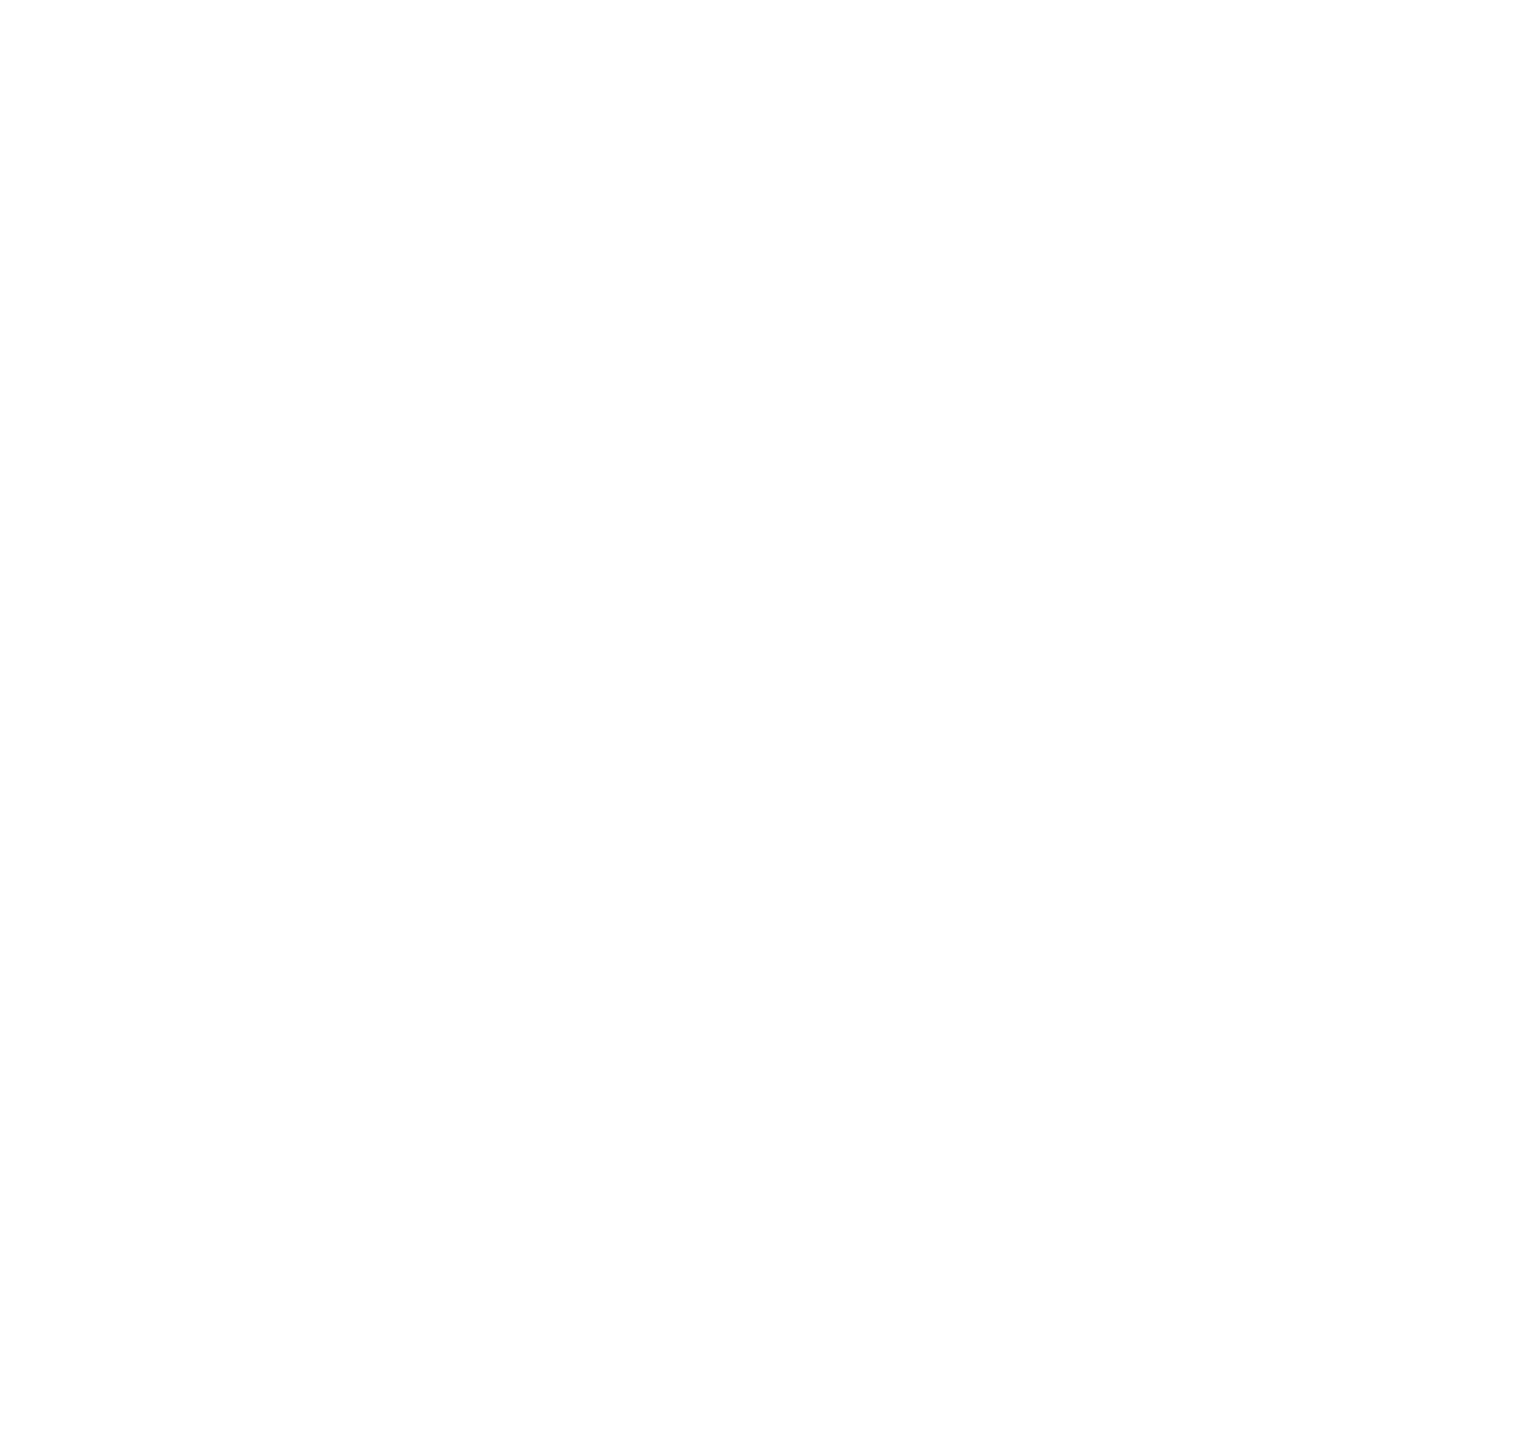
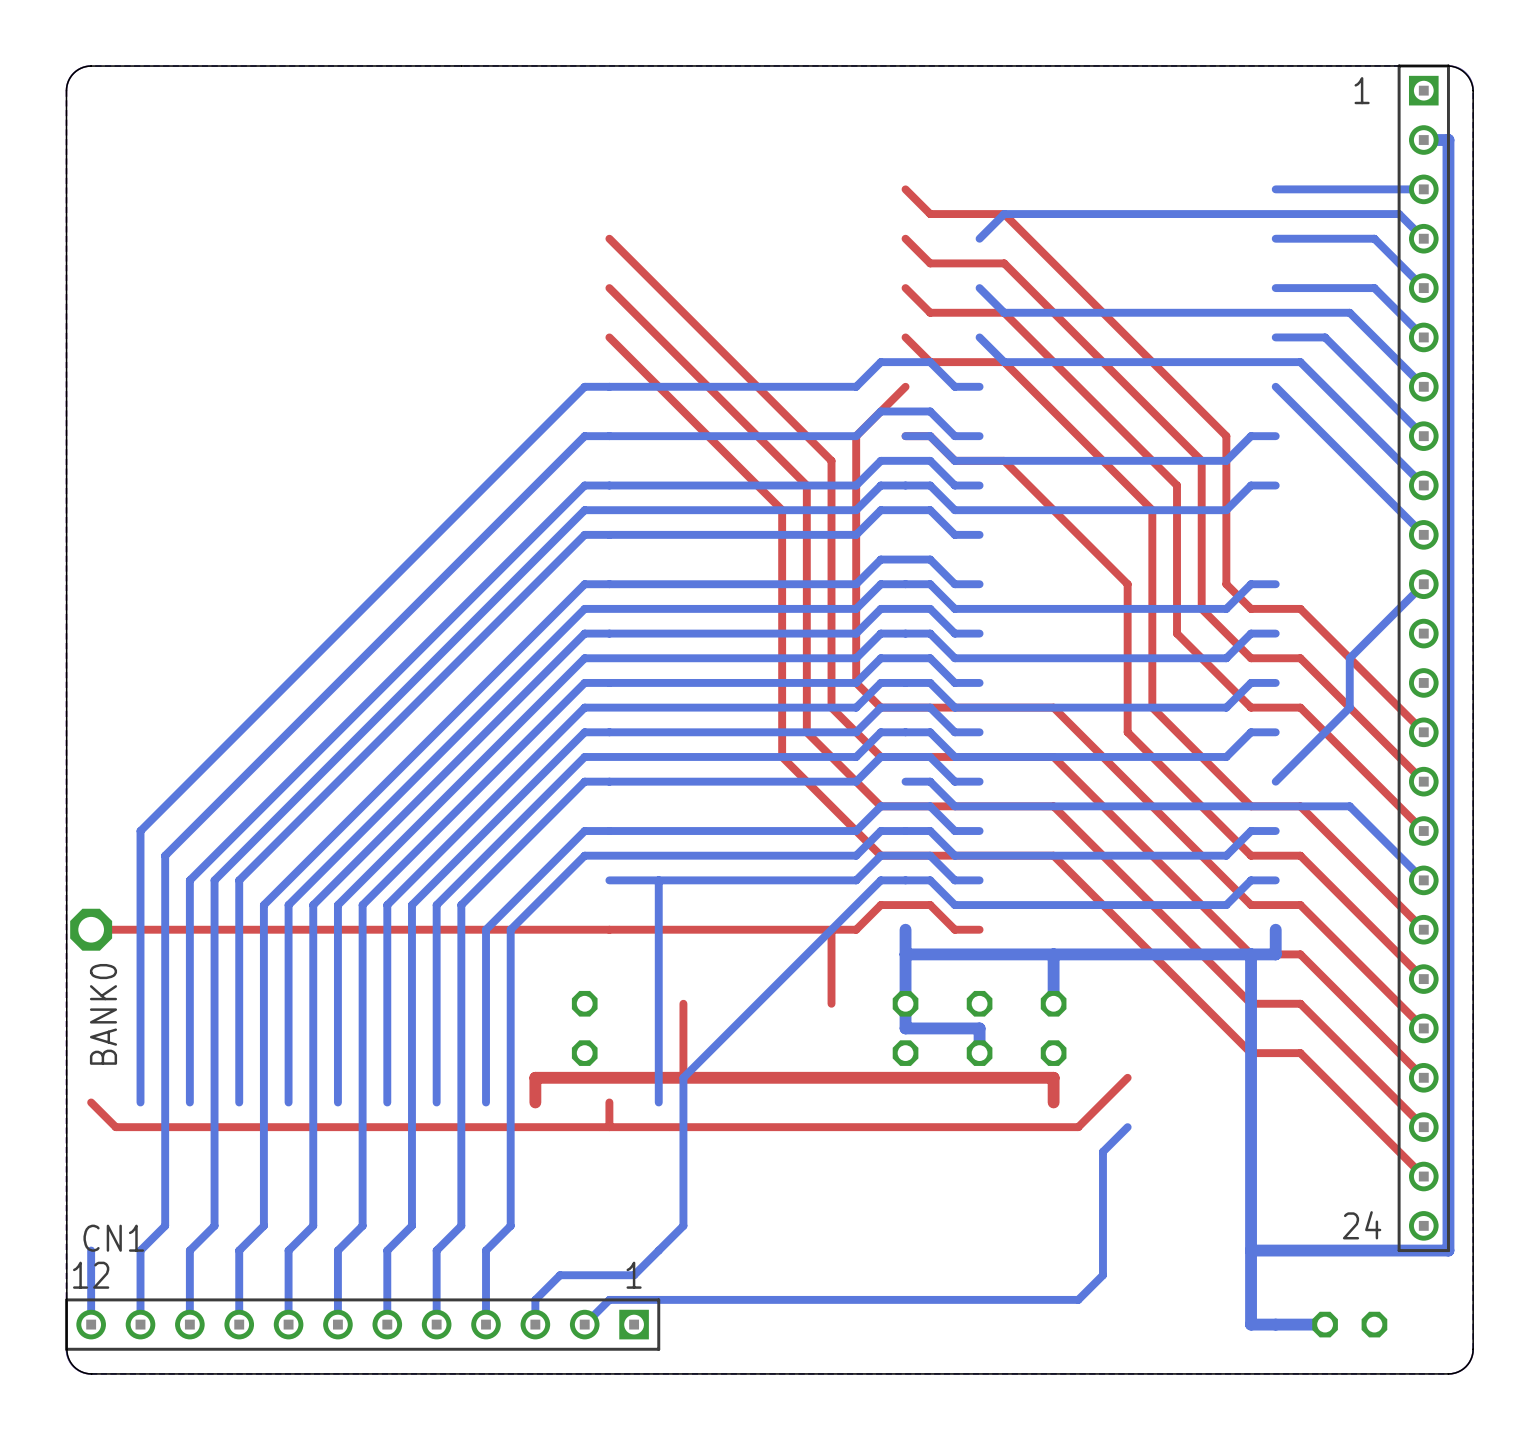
board edge: none -> (1448, 65) (91, 66) (83, 67) (73, 73) (68, 80) (66, 90) (66, 1349) (69, 1359) (74, 1366) (83, 1372) (91, 1373) (1448, 1373) (1457, 1372) (1465, 1366) (1471, 1358) (1473, 1349) (1473, 90) (1470, 81) (1465, 73) (1457, 68) (1448, 65)
bottom track: none -> (1423, 140) (1448, 140) (1448, 1250) (1251, 1250)
top track: none -> (905, 189) (930, 214) (1004, 214) (1226, 436) (1226, 584) (1251, 608) (1300, 608) (1423, 732)
bottom track: none -> (1423, 189) (1275, 189)
top track: none -> (609, 238) (831, 460) (831, 707) (880, 756) (1053, 756) (1251, 954) (1300, 954) (1423, 1077)
top track: none -> (905, 238) (930, 263) (1004, 263) (1201, 460) (1201, 608) (1251, 658) (1300, 658) (1423, 781)
bottom track: none -> (1275, 238) (1374, 238) (1423, 288)
bottom track: none -> (1423, 238) (1399, 214) (1004, 214) (979, 238)
top track: none -> (609, 288) (806, 485) (806, 732) (880, 806) (1053, 806) (1251, 1003) (1300, 1003) (1423, 1127)
top track: none -> (905, 288) (930, 312) (1004, 312) (1177, 485) (1177, 633) (1251, 707) (1300, 707) (1423, 831)
bottom track: none -> (979, 288) (1004, 312) (1349, 312) (1423, 386)
bottom track: none -> (1275, 288) (1374, 288) (1423, 337)
top track: none -> (609, 337) (782, 510) (782, 756) (880, 855) (1053, 855) (1251, 1053) (1300, 1053) (1423, 1176)
top track: none -> (905, 337) (930, 362) (1004, 362) (1152, 510) (1152, 707) (1251, 806) (1300, 806) (1423, 929)
bottom track: none -> (979, 337) (1004, 362) (1300, 362) (1423, 485)
bottom track: none -> (1275, 337) (1325, 337) (1423, 436)
top track: none -> (905, 386) (856, 436) (856, 682) (880, 707) (1053, 707) (1251, 905) (1300, 905) (1423, 1028)
bottom track: none -> (979, 386) (954, 386) (930, 362) (880, 362) (856, 386) (584, 386) (140, 831) (140, 1102)
bottom track: none -> (1275, 386) (1423, 534)
top track: none -> (905, 436) (930, 436) (954, 460) (1004, 460) (1127, 584) (1127, 732) (1251, 855) (1300, 855) (1423, 979)
bottom track: none -> (979, 436) (954, 436) (930, 411) (880, 411) (856, 436) (584, 436) (165, 855) (165, 1225) (140, 1250) (140, 1324)
bottom track: none -> (1275, 436) (1251, 436) (1226, 460) (954, 460) (930, 436) (905, 436)
bottom track: none -> (979, 485) (954, 485) (930, 460) (880, 460) (856, 485) (584, 485) (189, 880) (189, 1102)
bottom track: none -> (1275, 485) (1251, 485) (1226, 510) (954, 510) (930, 485) (880, 485) (856, 510) (584, 510) (214, 880) (214, 1225) (189, 1250) (189, 1324)
bottom track: none -> (979, 534) (954, 534) (930, 510) (880, 510) (856, 534) (584, 534) (239, 880) (239, 1102)
bottom track: none -> (979, 584) (954, 584) (930, 559) (880, 559) (856, 584) (584, 584) (263, 905) (263, 1225) (239, 1250) (239, 1324)
bottom track: none -> (1275, 584) (1251, 584) (1226, 608) (954, 608) (930, 584) (880, 584) (856, 608) (584, 608) (288, 905) (288, 1102)
bottom track: none -> (1423, 584) (1349, 658) (1349, 707) (1275, 781)
bottom track: none -> (979, 633) (954, 633) (930, 608) (880, 608) (856, 633) (584, 633) (313, 905) (313, 1225) (288, 1250) (288, 1324)
bottom track: none -> (1275, 633) (1251, 633) (1226, 658) (954, 658) (930, 633) (880, 633) (856, 658) (584, 658) (337, 905) (337, 1102)
bottom track: none -> (979, 682) (954, 682) (930, 658) (880, 658) (856, 682) (584, 682) (362, 905) (362, 1225) (337, 1250) (337, 1324)
bottom track: none -> (1275, 682) (1251, 682) (1226, 707) (954, 707) (930, 682) (880, 682) (856, 707) (584, 707) (387, 905) (387, 1102)
CN1: none -> (757, 707)
bottom track: none -> (979, 732) (954, 732) (930, 707) (880, 707) (856, 732) (584, 732) (411, 905) (411, 1225) (387, 1250) (387, 1324)
bottom track: none -> (1275, 732) (1251, 732) (1226, 756) (954, 756) (930, 732) (880, 732) (856, 756) (584, 756) (436, 905) (436, 1102)
bottom track: none -> (905, 781) (930, 781) (954, 806) (1349, 806) (1423, 880)
bottom track: none -> (979, 781) (954, 781) (930, 756) (880, 756) (856, 781) (584, 781) (461, 905) (461, 1225) (436, 1250) (436, 1324)
bottom track: none -> (979, 831) (954, 831) (930, 806) (880, 806) (856, 831) (584, 831) (486, 929) (486, 1102)
bottom track: none -> (1275, 831) (1251, 831) (1226, 855) (954, 855) (930, 831) (880, 831) (856, 855) (584, 855) (510, 929) (510, 1225) (486, 1250) (486, 1324)
bottom track: none -> (658, 880) (658, 1102)
bottom track: none -> (979, 880) (954, 880) (930, 855) (880, 855) (856, 880) (609, 880)
bottom track: none -> (1275, 880) (1251, 880) (1226, 905) (954, 905) (930, 880) (880, 880) (683, 1077) (683, 1225) (634, 1275) (560, 1275) (535, 1299) (535, 1324)
BANK0: none -> (91, 929)
top track: none -> (831, 929) (831, 1003)
bottom track: none -> (905, 929) (905, 1028) (979, 1028) (979, 1053)
top track: none -> (979, 929) (954, 929) (930, 905) (880, 905) (856, 929) (91, 929)
bottom track: none -> (1275, 929) (1275, 954) (905, 954)
bottom track: none -> (1053, 954) (1053, 1003)
bottom track: none -> (1251, 954) (1251, 1324) (1325, 1324)
top track: none -> (683, 1003) (683, 1077)
part: none -> (584, 1028)
part: none -> (905, 1028)
part: none -> (979, 1028)
part: none -> (1053, 1028)
top track: none -> (1127, 1077) (1078, 1127) (115, 1127) (91, 1102)
top track: none -> (609, 1102) (609, 1127)
top track: none -> (1053, 1102) (1053, 1077) (535, 1077) (535, 1102)
bottom track: none -> (1127, 1127) (1102, 1151) (1102, 1275) (1078, 1299) (609, 1299) (584, 1324)
bottom track: none -> (91, 1250) (91, 1324)
part: none -> (1349, 1324)

